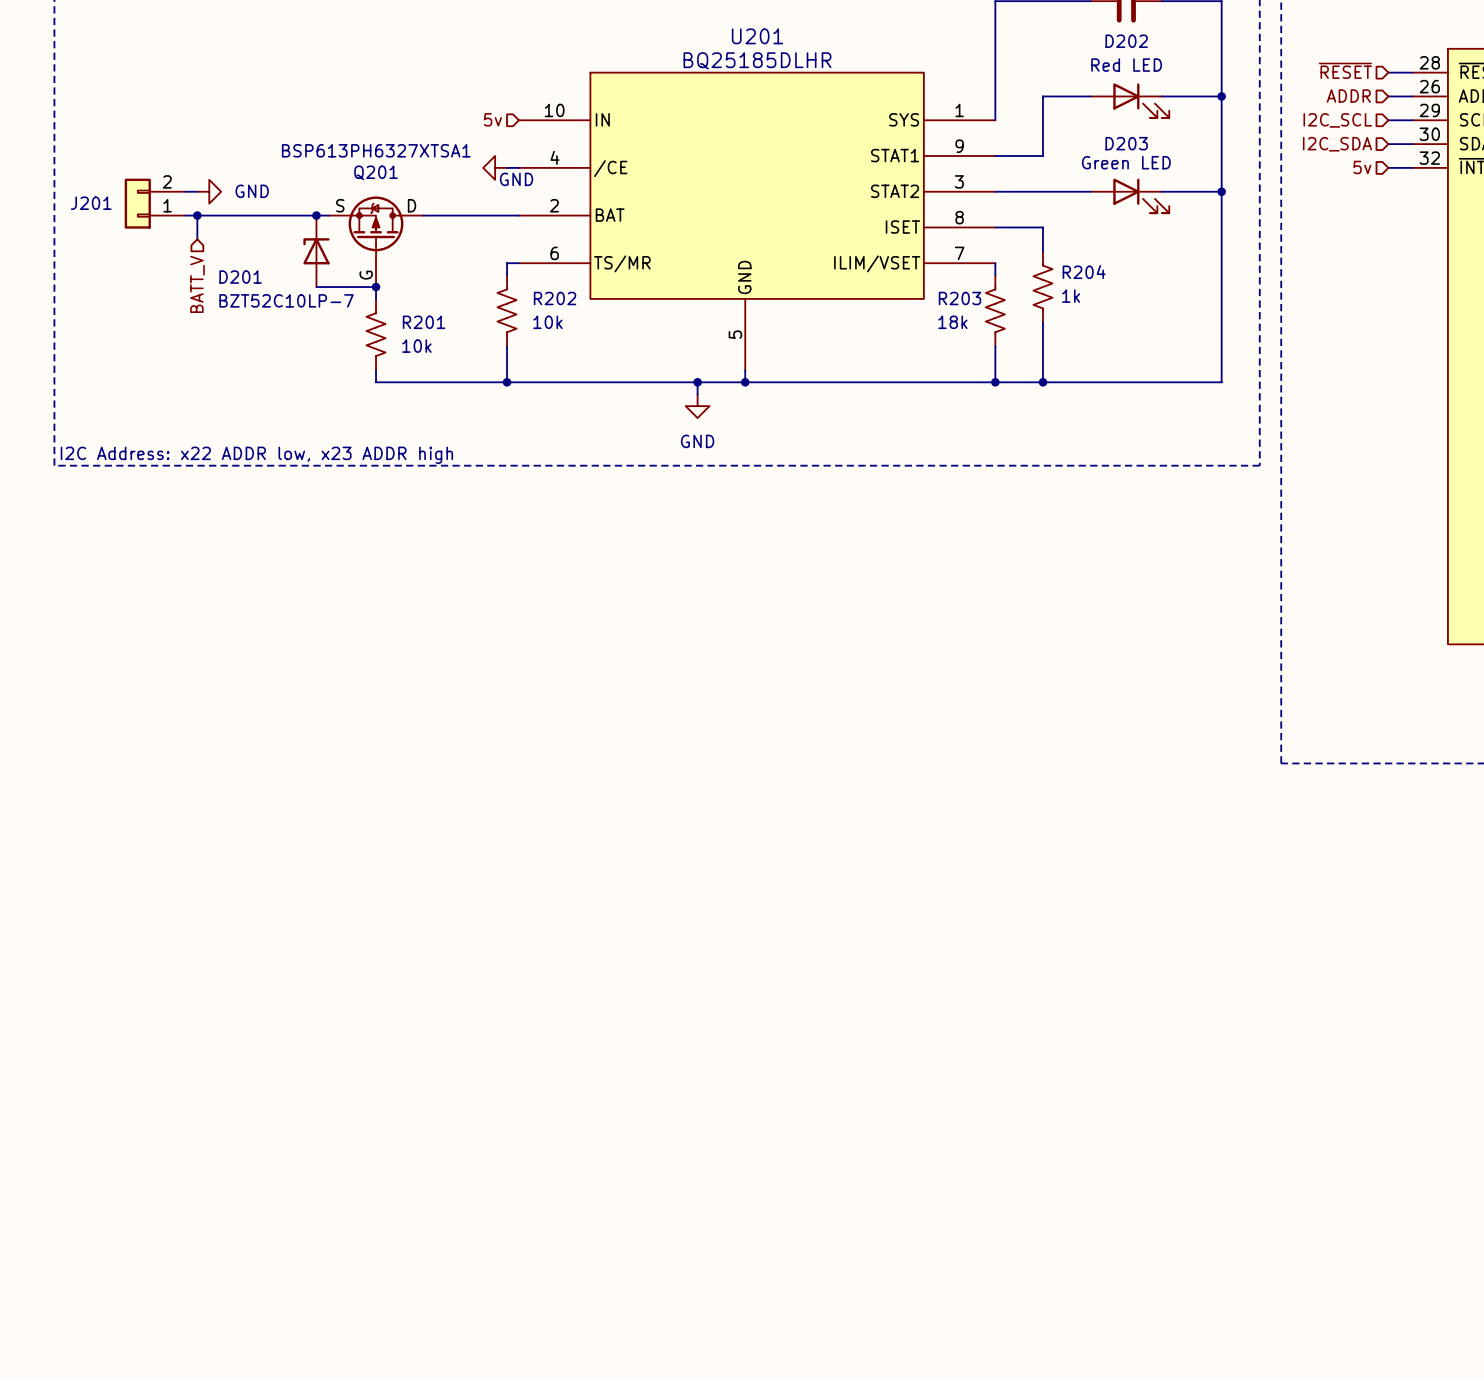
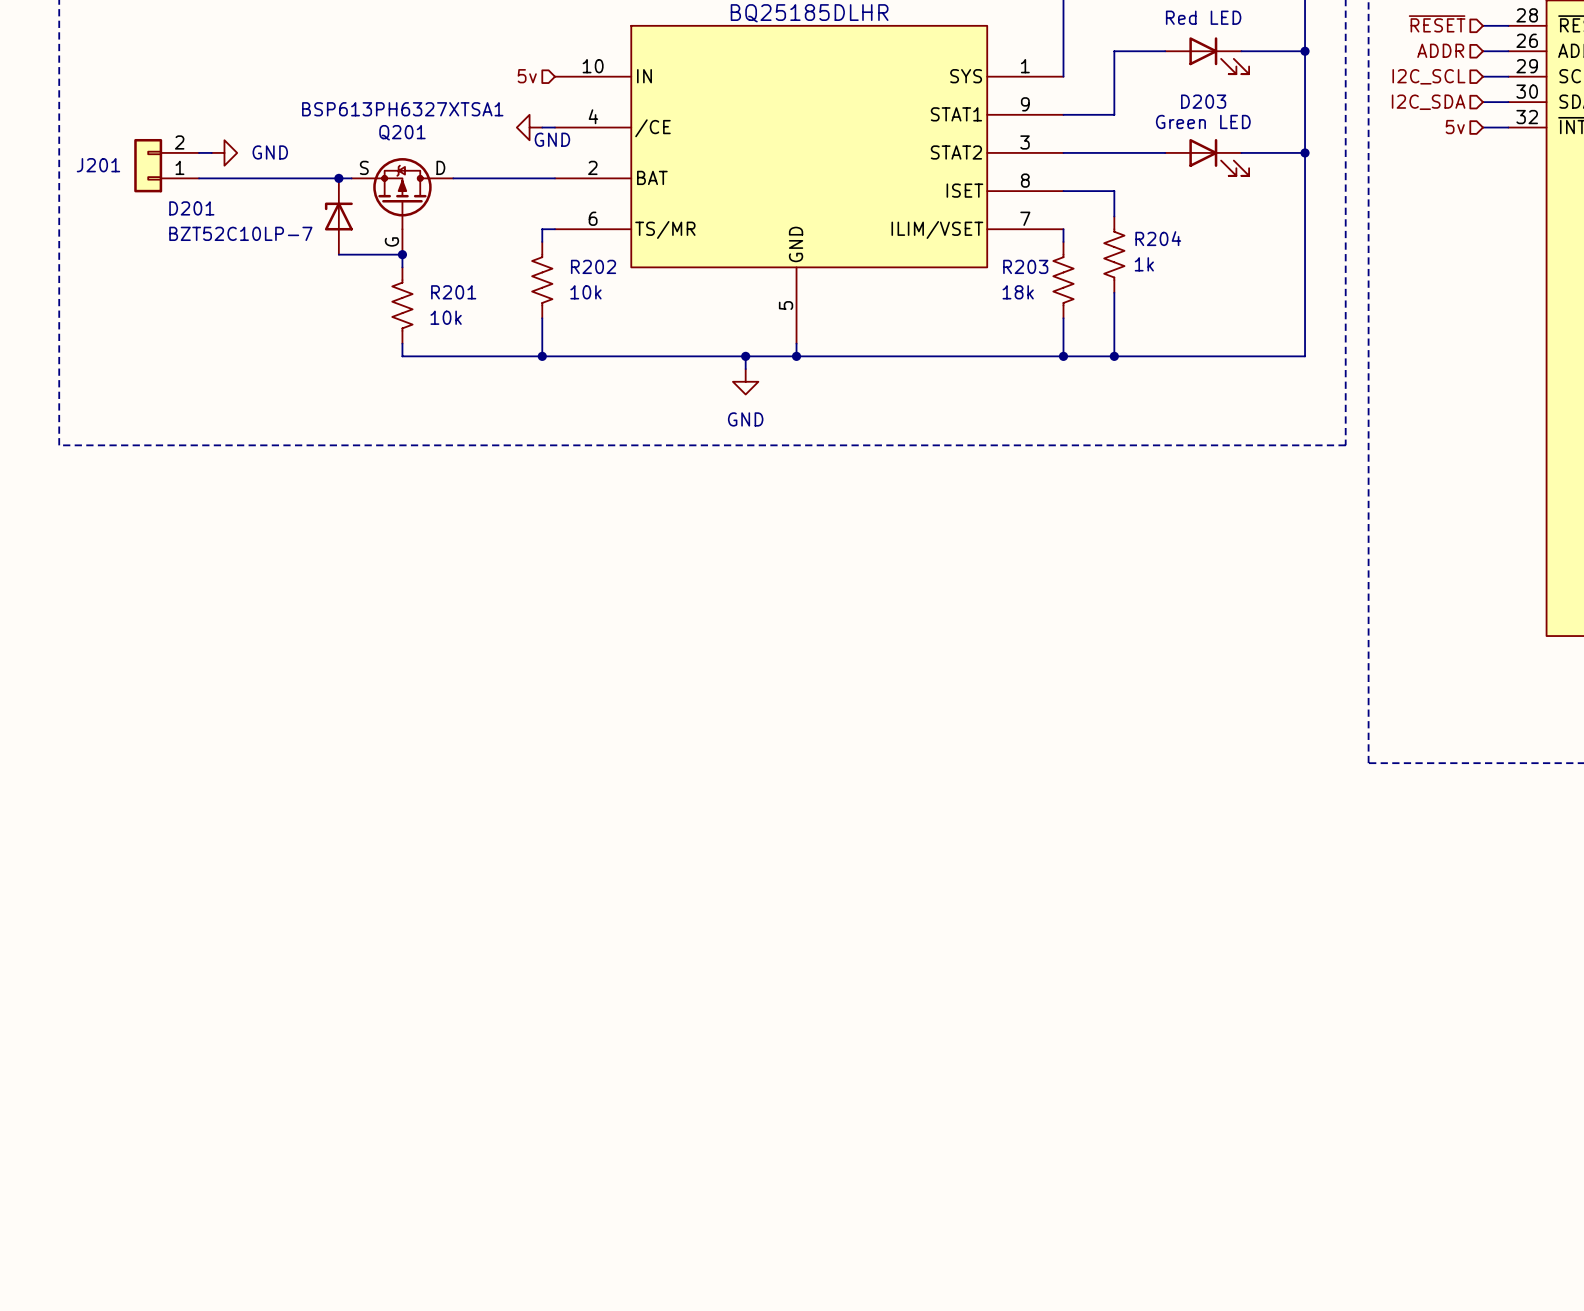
wire: (197, 215) (197, 239) -> none
junction: (197, 215) -> none
D201 name position: D201 (240, 277) -> D201 (191, 208)
hierarchical label: BATT_V (197, 284) -> none
D201 value position: BZT52C10LP-7 (286, 300) -> BZT52C10LP-7 (240, 233)
text: I2C Address: x22 ADDR low, x23 ADDR high (256, 455) -> none

